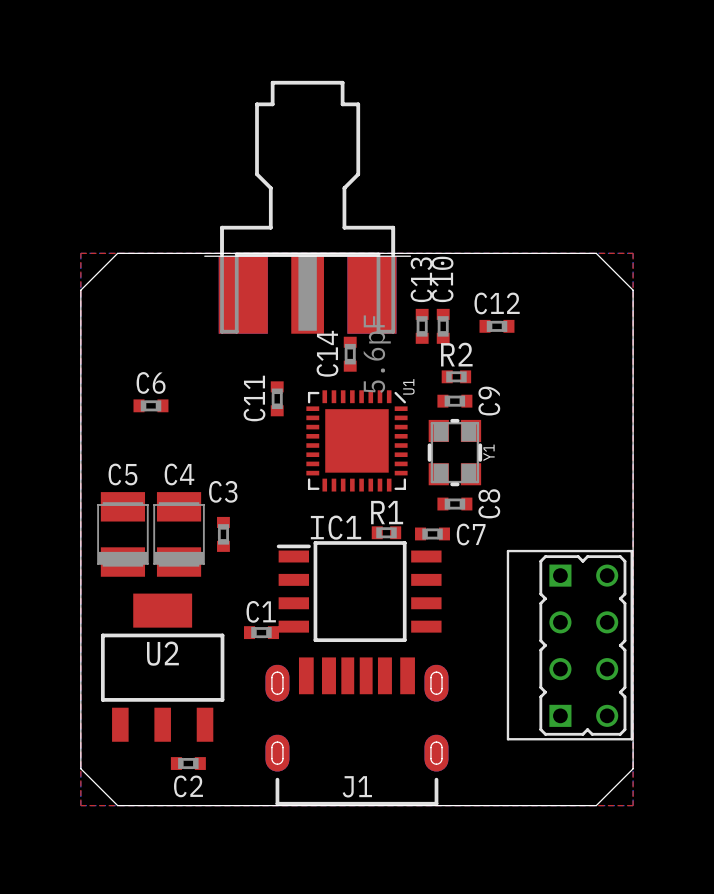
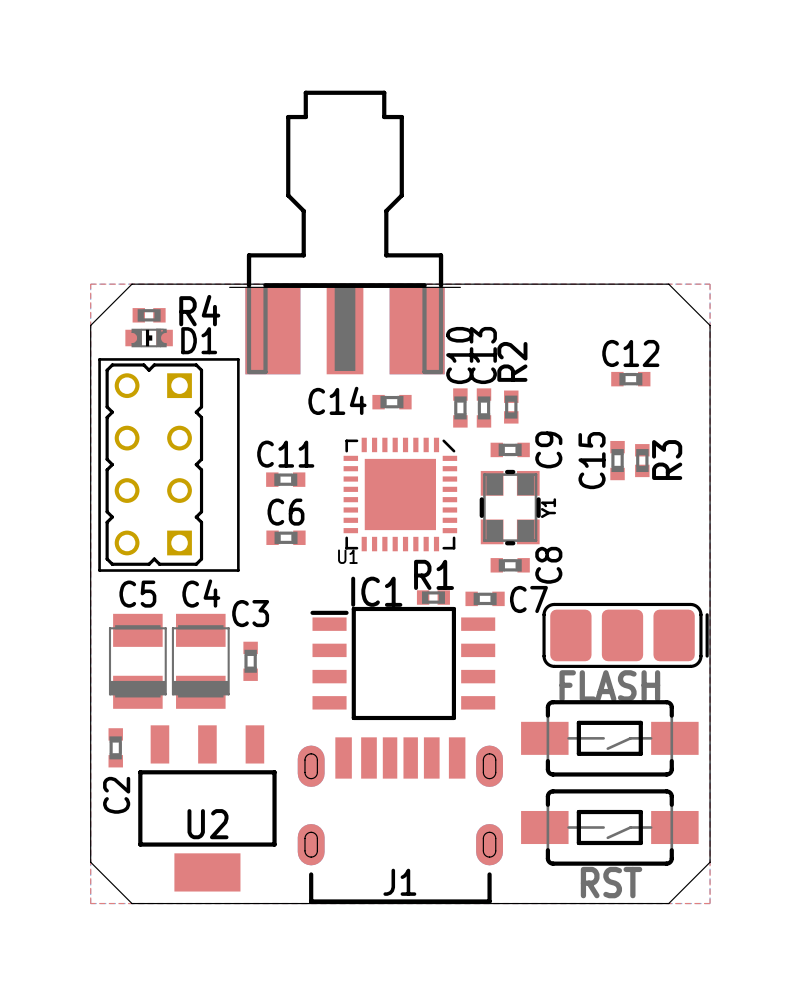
R4: none -> (149, 315)
D1: none -> (149, 338)
C13 position: (422, 326) -> (483, 407)
C10 position: (443, 326) -> (460, 407)
C12 position: (496, 326) -> (630, 379)
C14 rotation: 0° (350, 354) -> 90° clockwise (392, 402)
C14 value: 5.6pF (377, 354) -> none
R2 rotation: 0° (456, 376) -> 90° clockwise (511, 407)
U1 name rotation: 0° (408, 386) -> 90° clockwise (347, 556)
U1 name position: U1 (408, 386) -> U1 (347, 556)
C11 rotation: 0° (277, 398) -> 90° clockwise (285, 479)
C11 position: (277, 398) -> (285, 479)
C6 position: (150, 405) -> (285, 537)
C15: none -> (617, 460)
R3: none -> (642, 460)
part: none -> (168, 464)
C5 position: (122, 534) -> (137, 661)
C4 position: (179, 534) -> (200, 661)
C3 position: (223, 534) -> (250, 661)
part: none -> (625, 635)
C1: (261, 632) -> none
part: (569, 645) -> none
part: none -> FLASH (609, 738)
U2 rotation: 0° (162, 667) -> 180° (207, 808)
part: none -> RST (609, 827)
C2 rotation: 0° (188, 763) -> 90° clockwise (115, 747)
C2 position: (188, 763) -> (115, 747)

